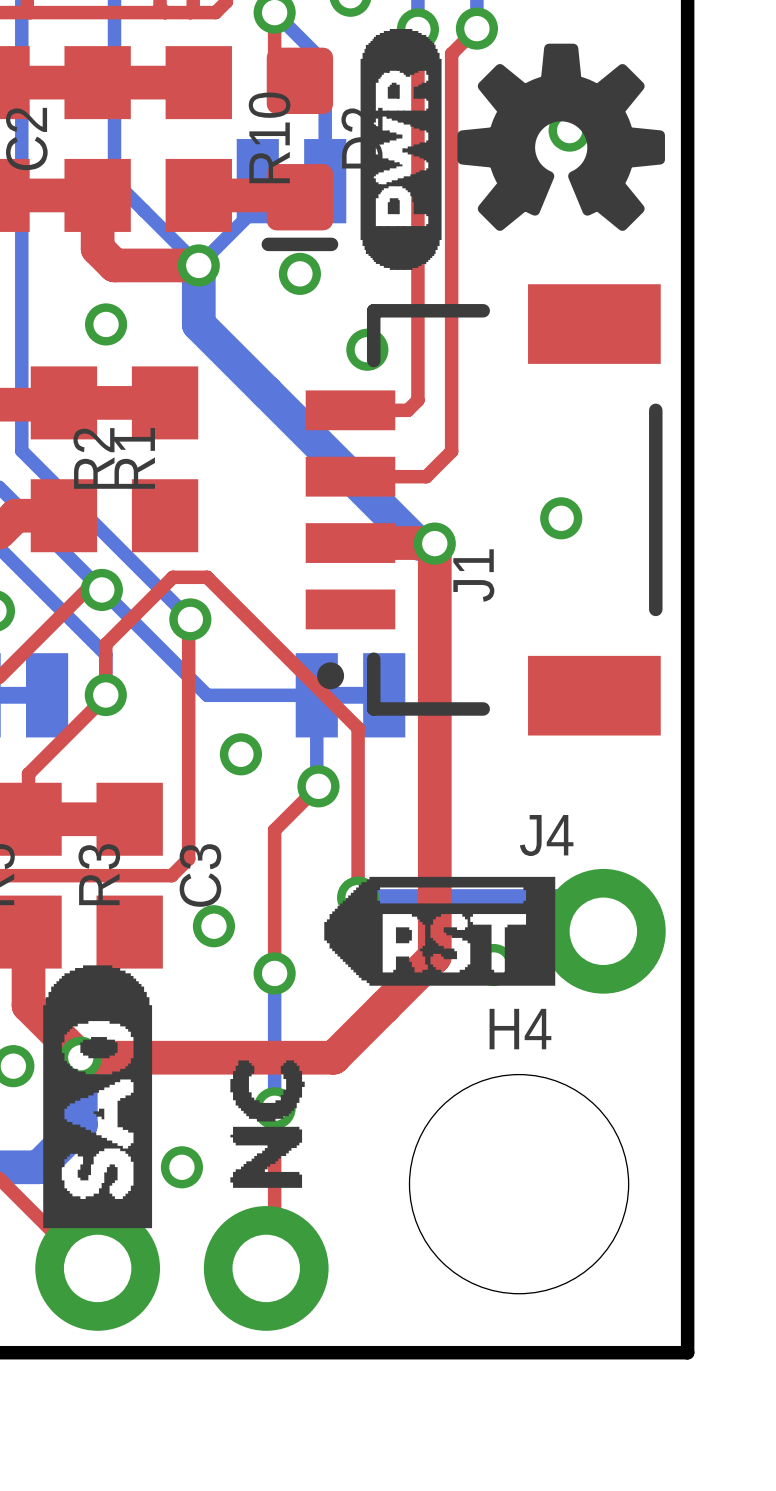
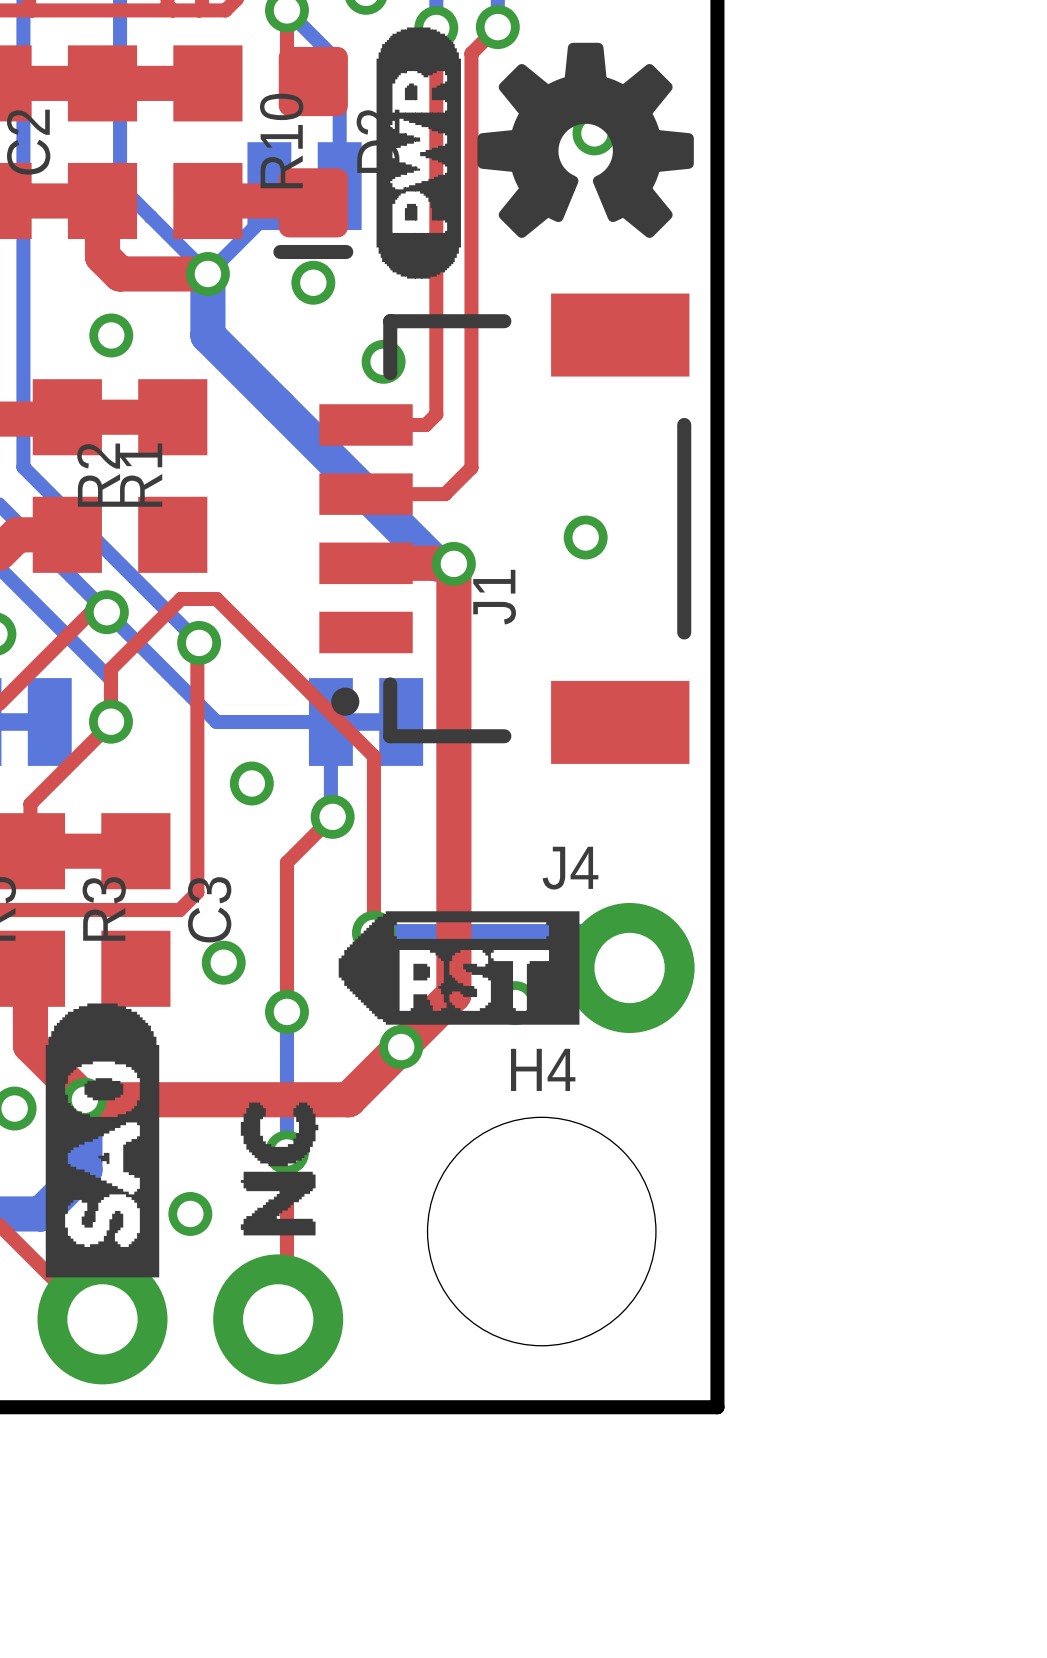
via: none -> (401, 1047)

